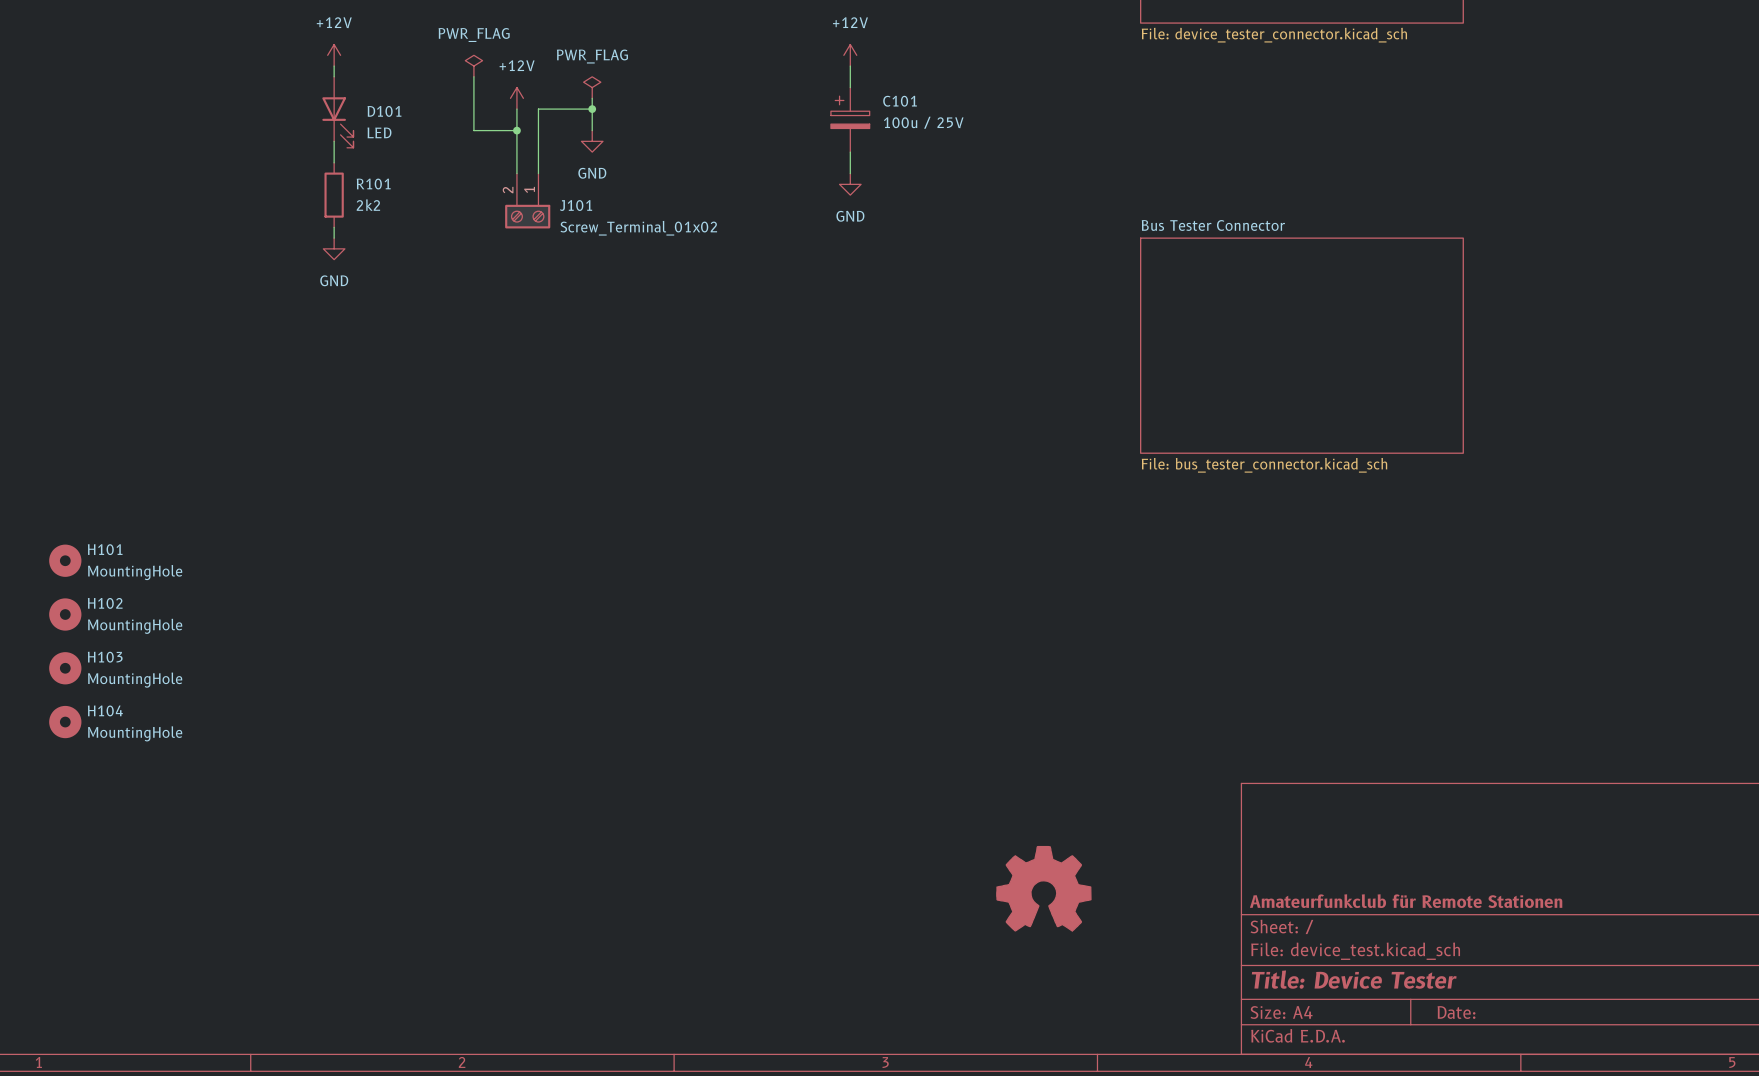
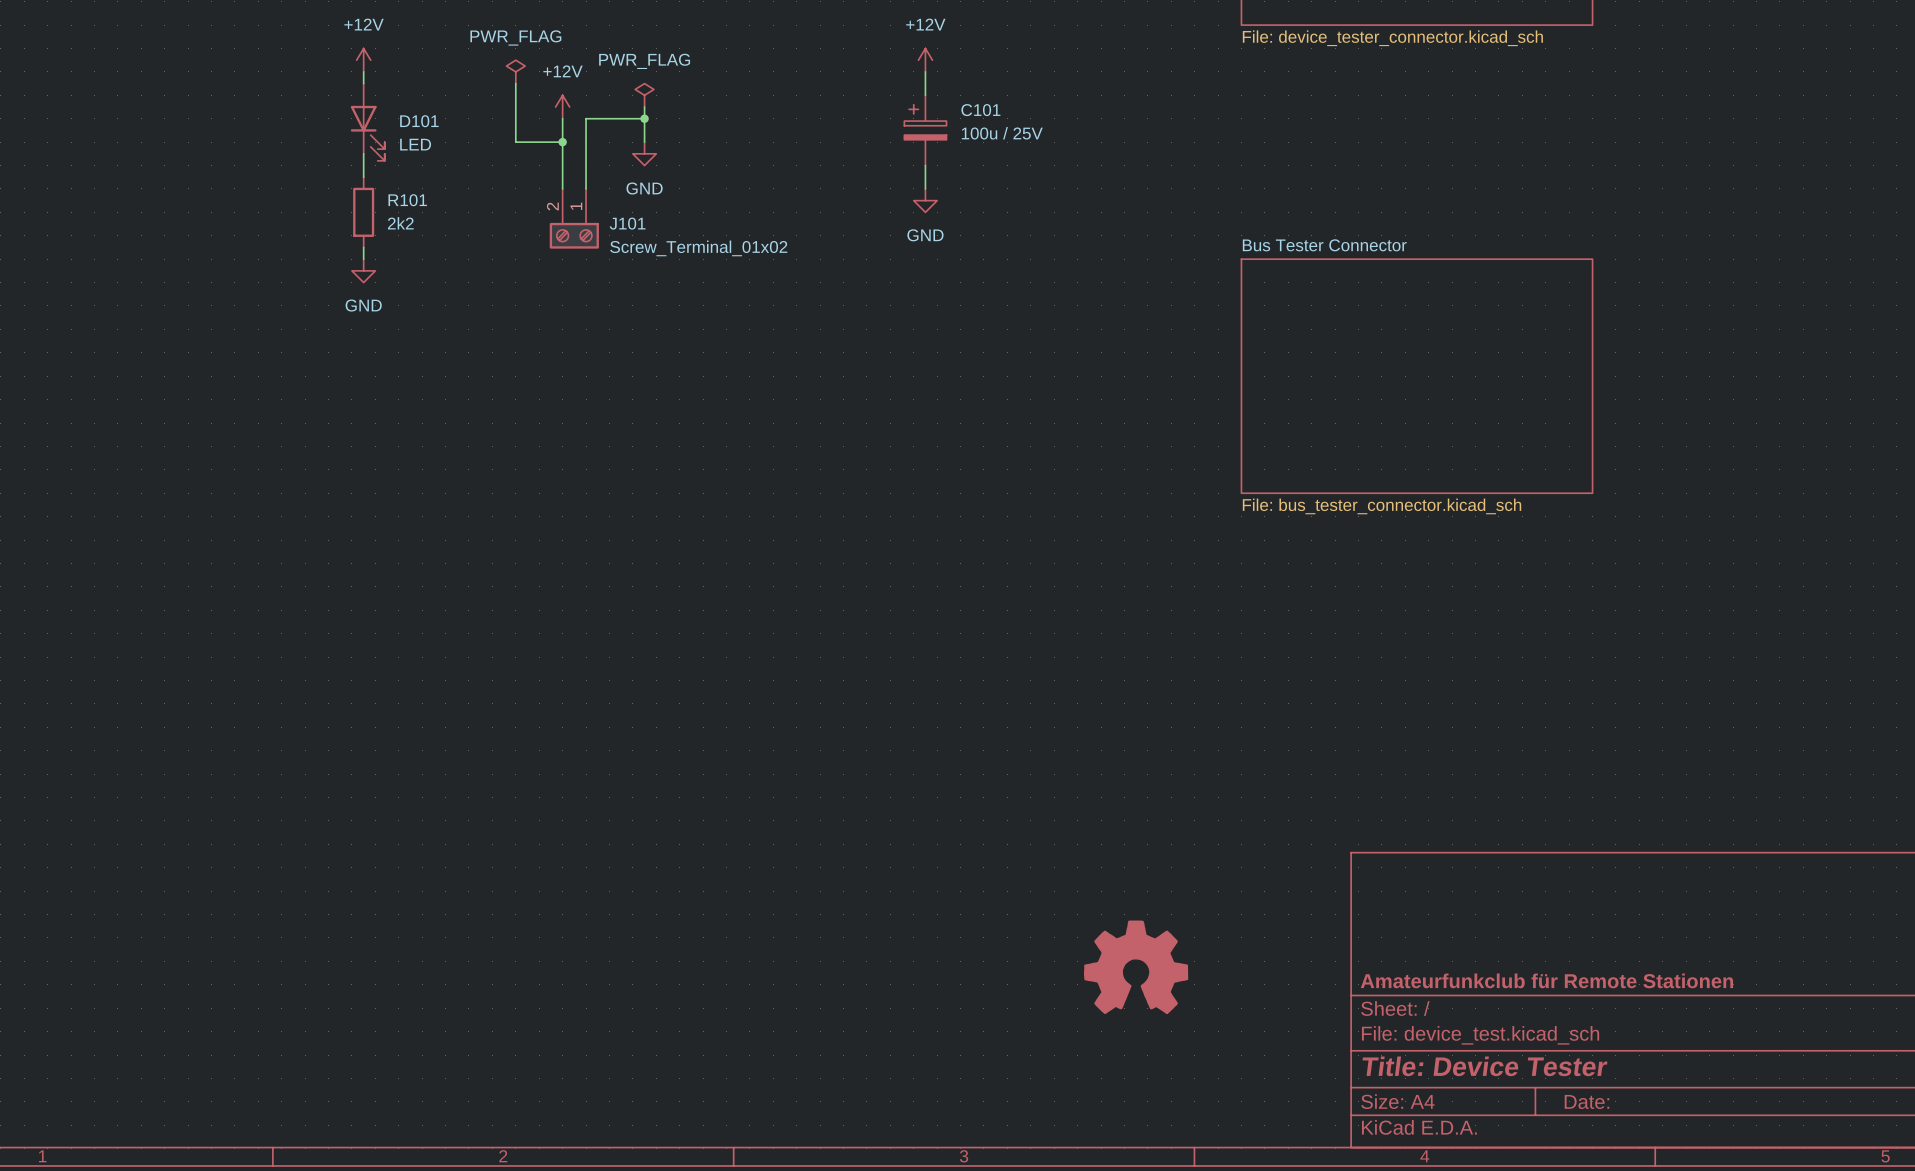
H101: MountingHole (65, 560) -> none
H102: MountingHole (65, 614) -> none
H103: MountingHole (65, 668) -> none
H104: MountingHole (65, 722) -> none

